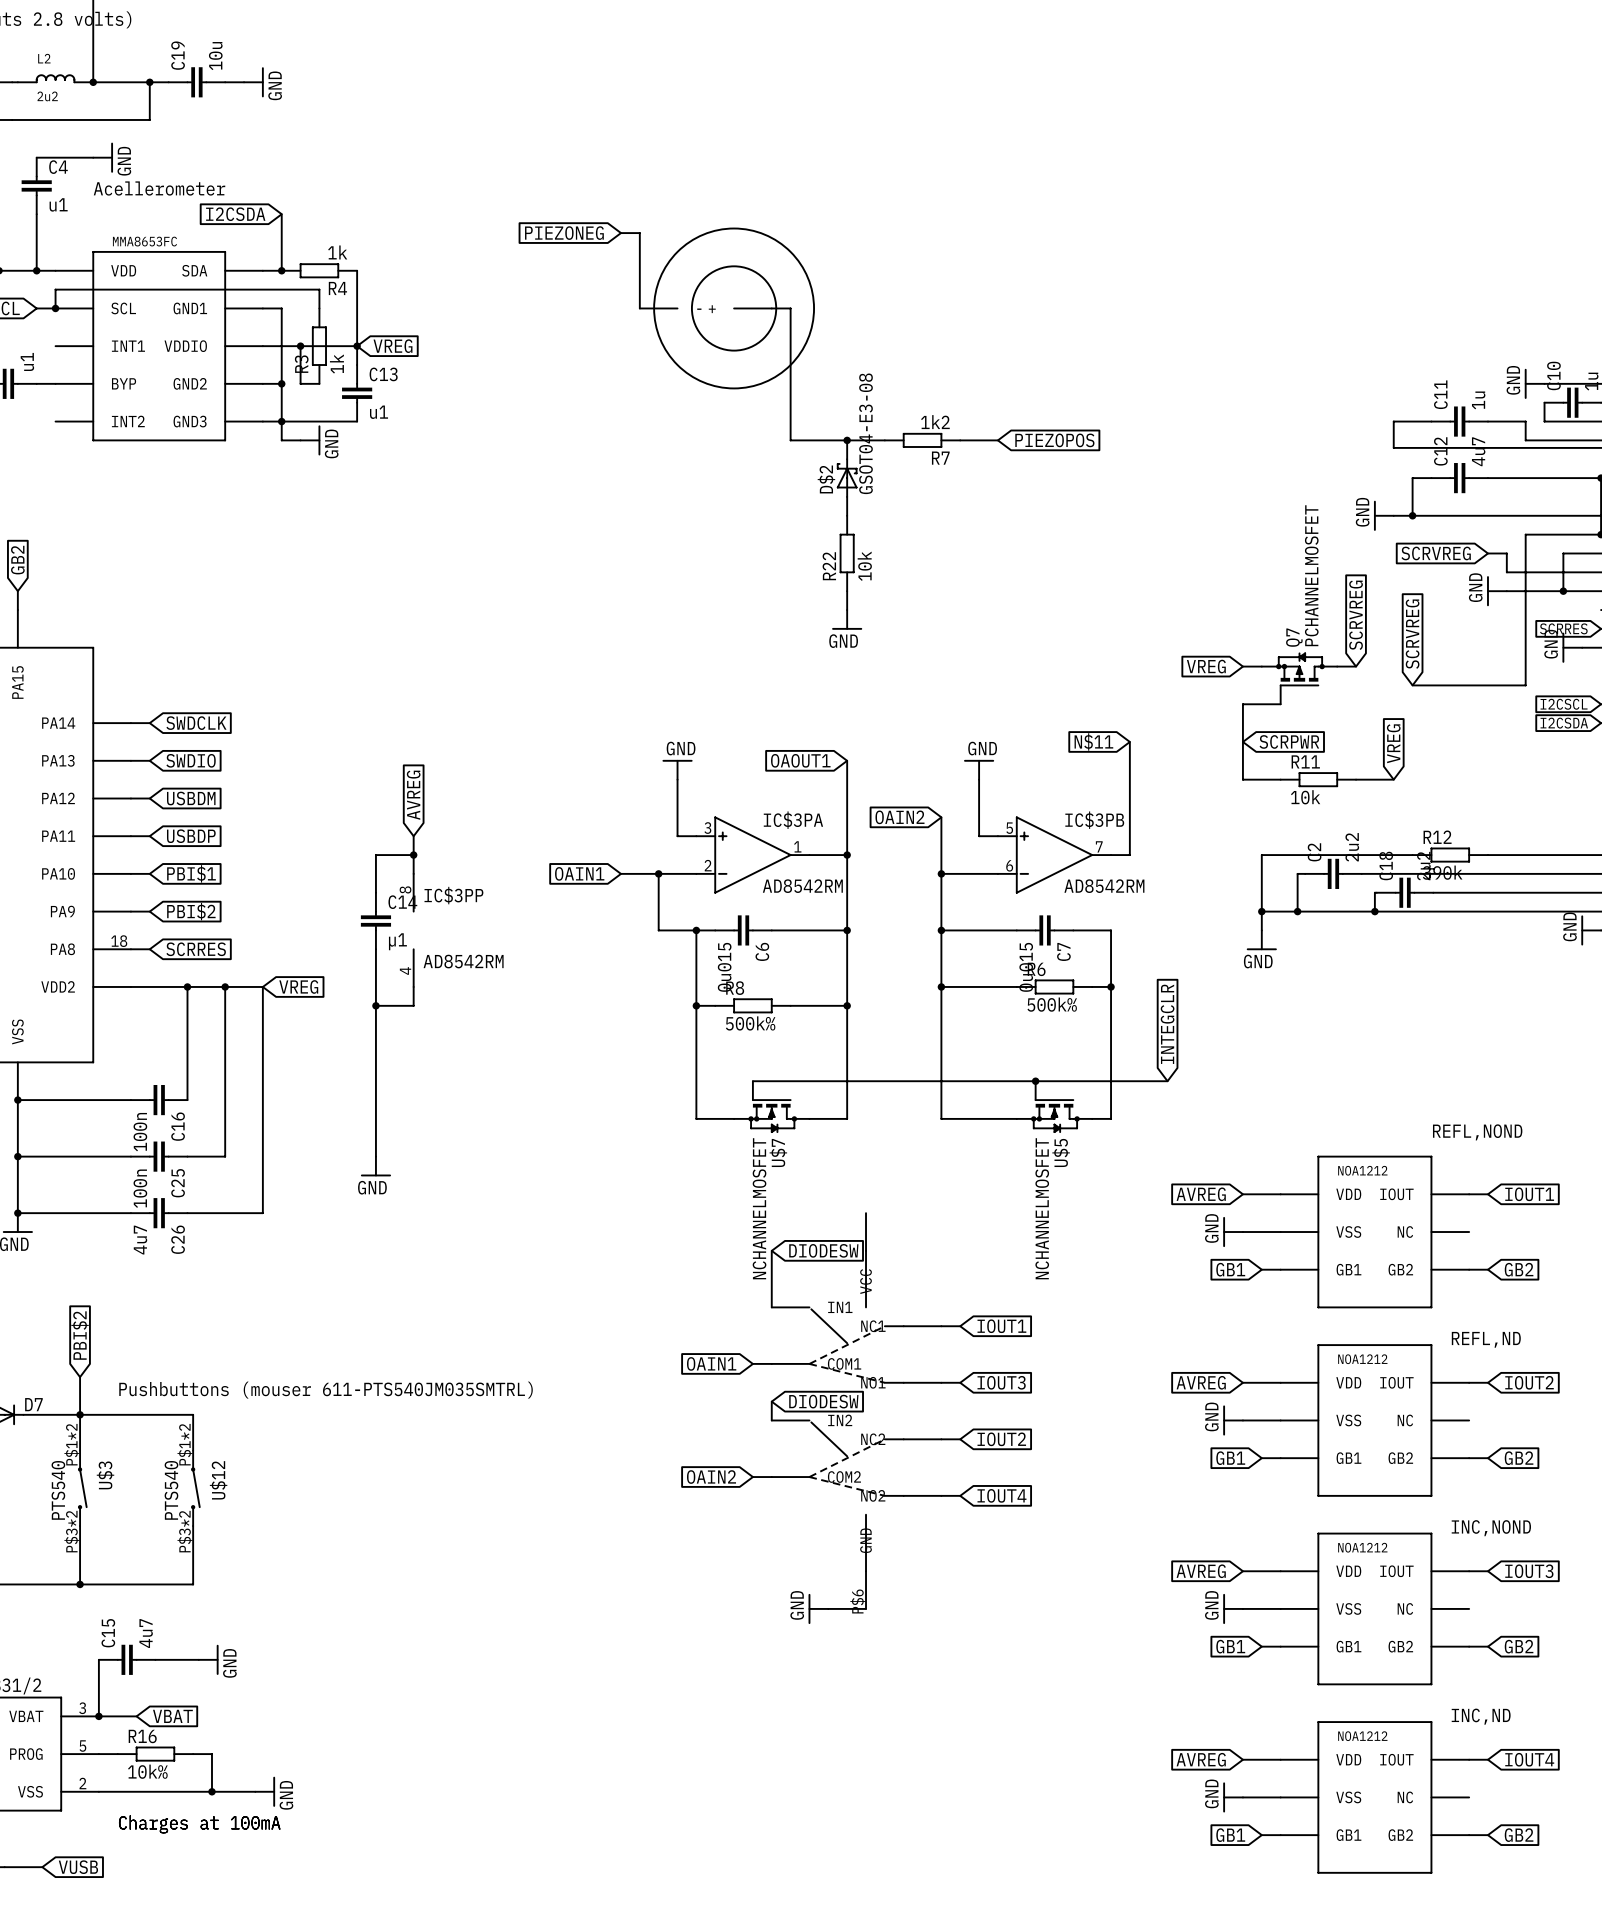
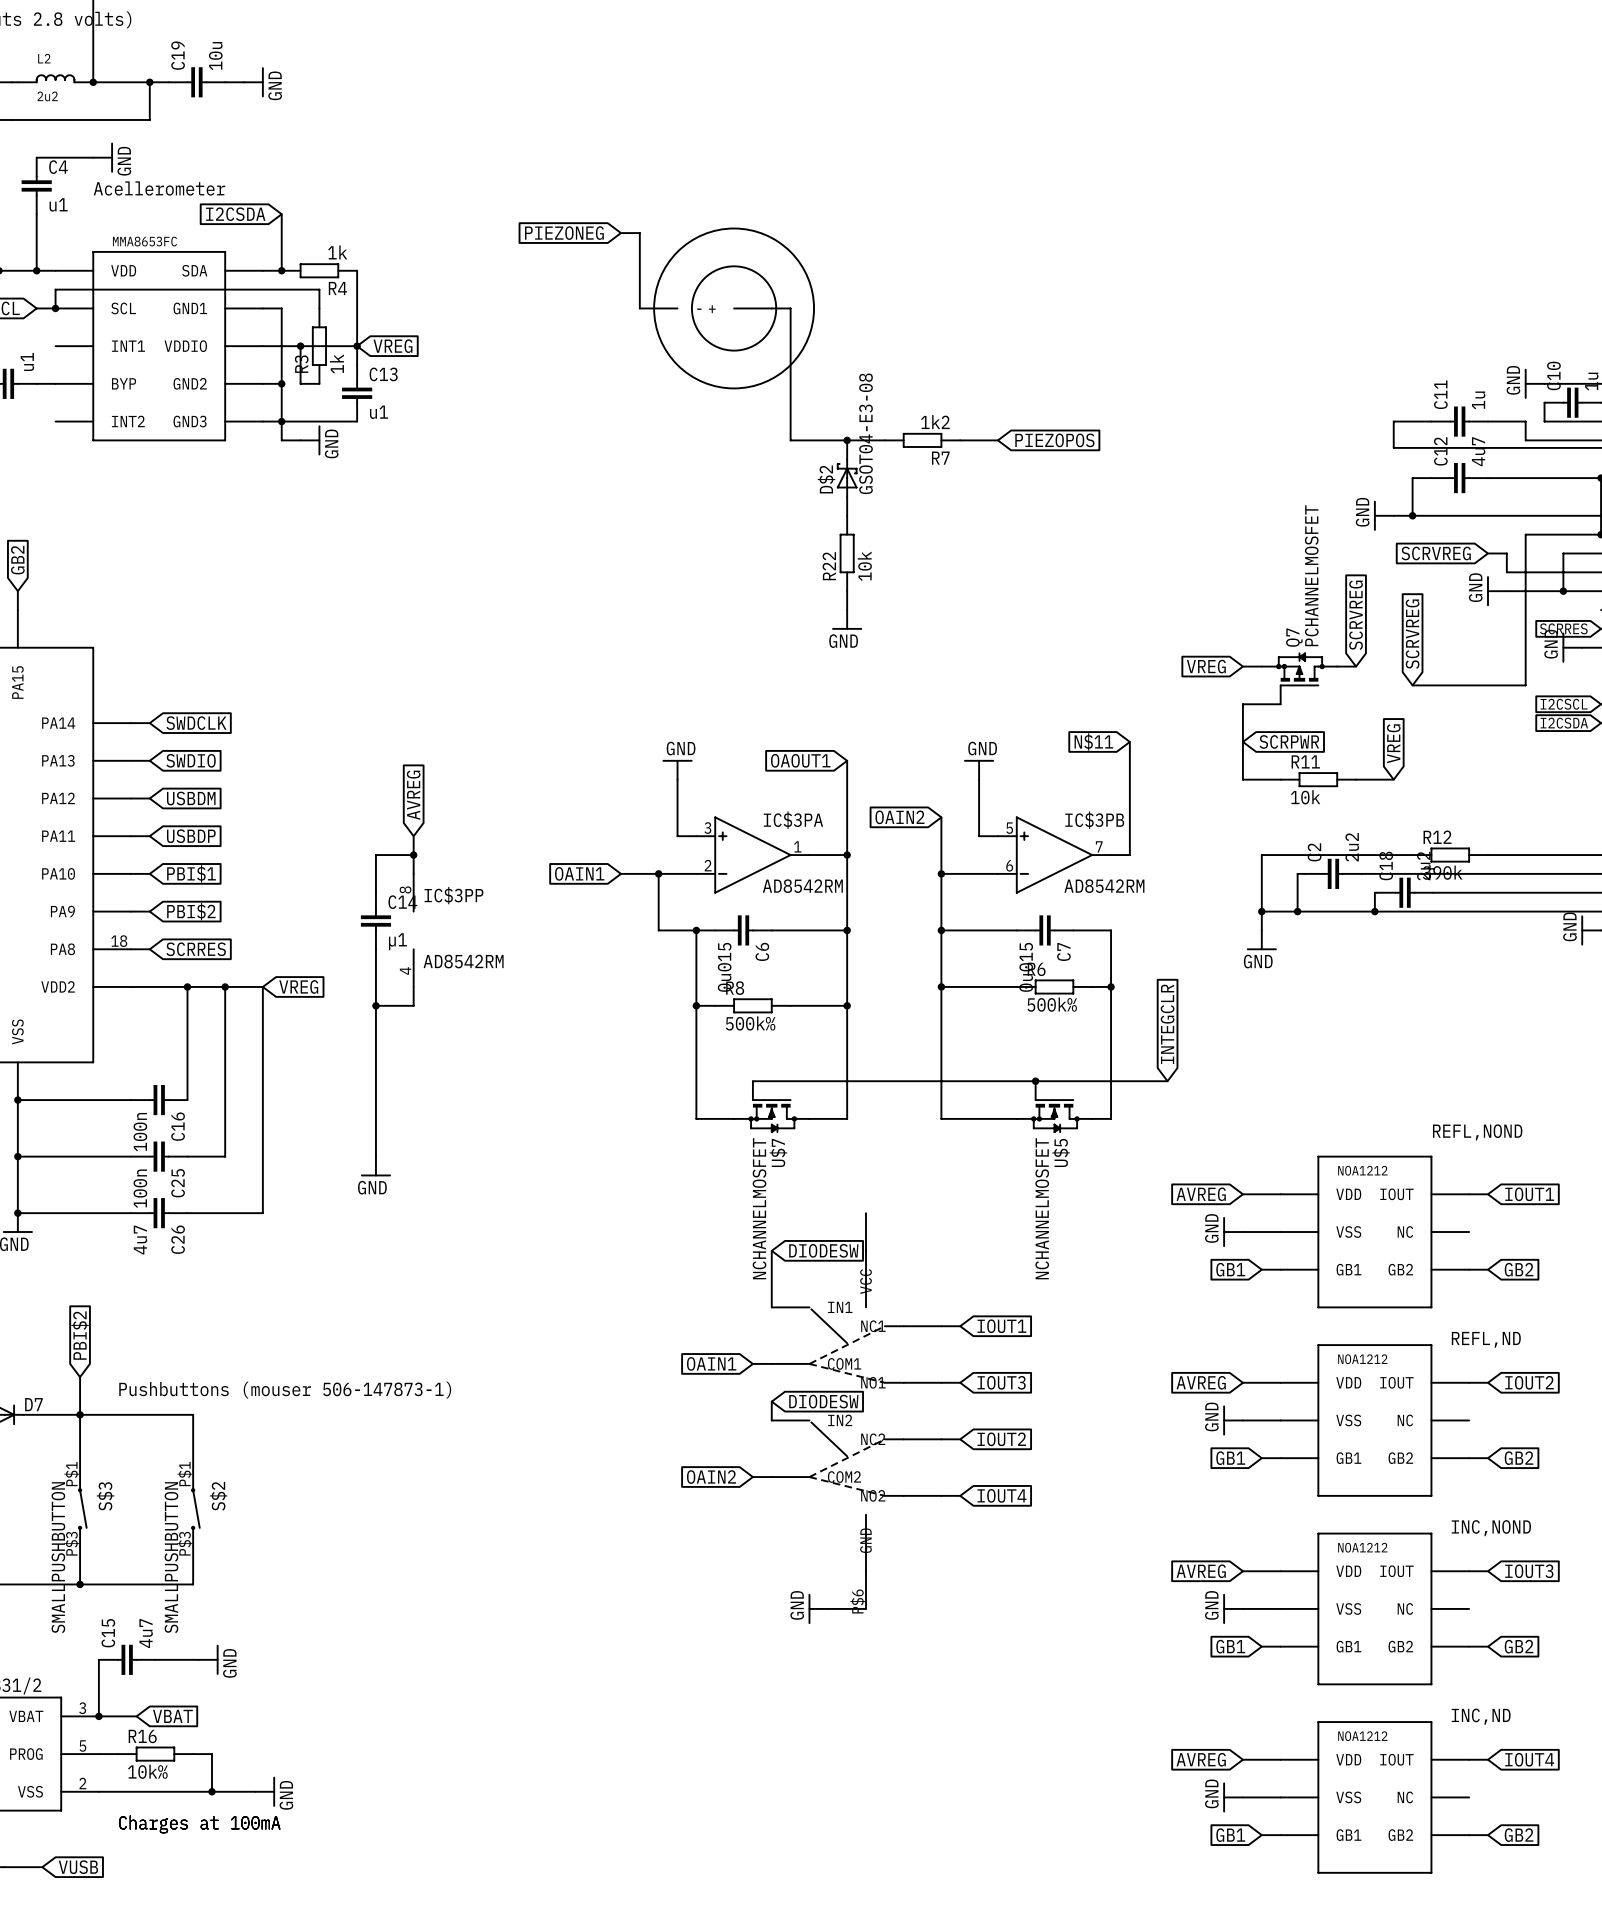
text: Pushbuttons (mouser 611-PTS540JM035SMTRL) (326, 1390) -> Pushbuttons (mouser 506-147873-1) (285, 1390)
U$3: PTS540 (82, 1488) -> none
U$12: PTS540 (195, 1488) -> none
S$3: none -> SMALLPUSHBUTTON (82, 1509)
S$2: none -> SMALLPUSHBUTTON (195, 1509)

